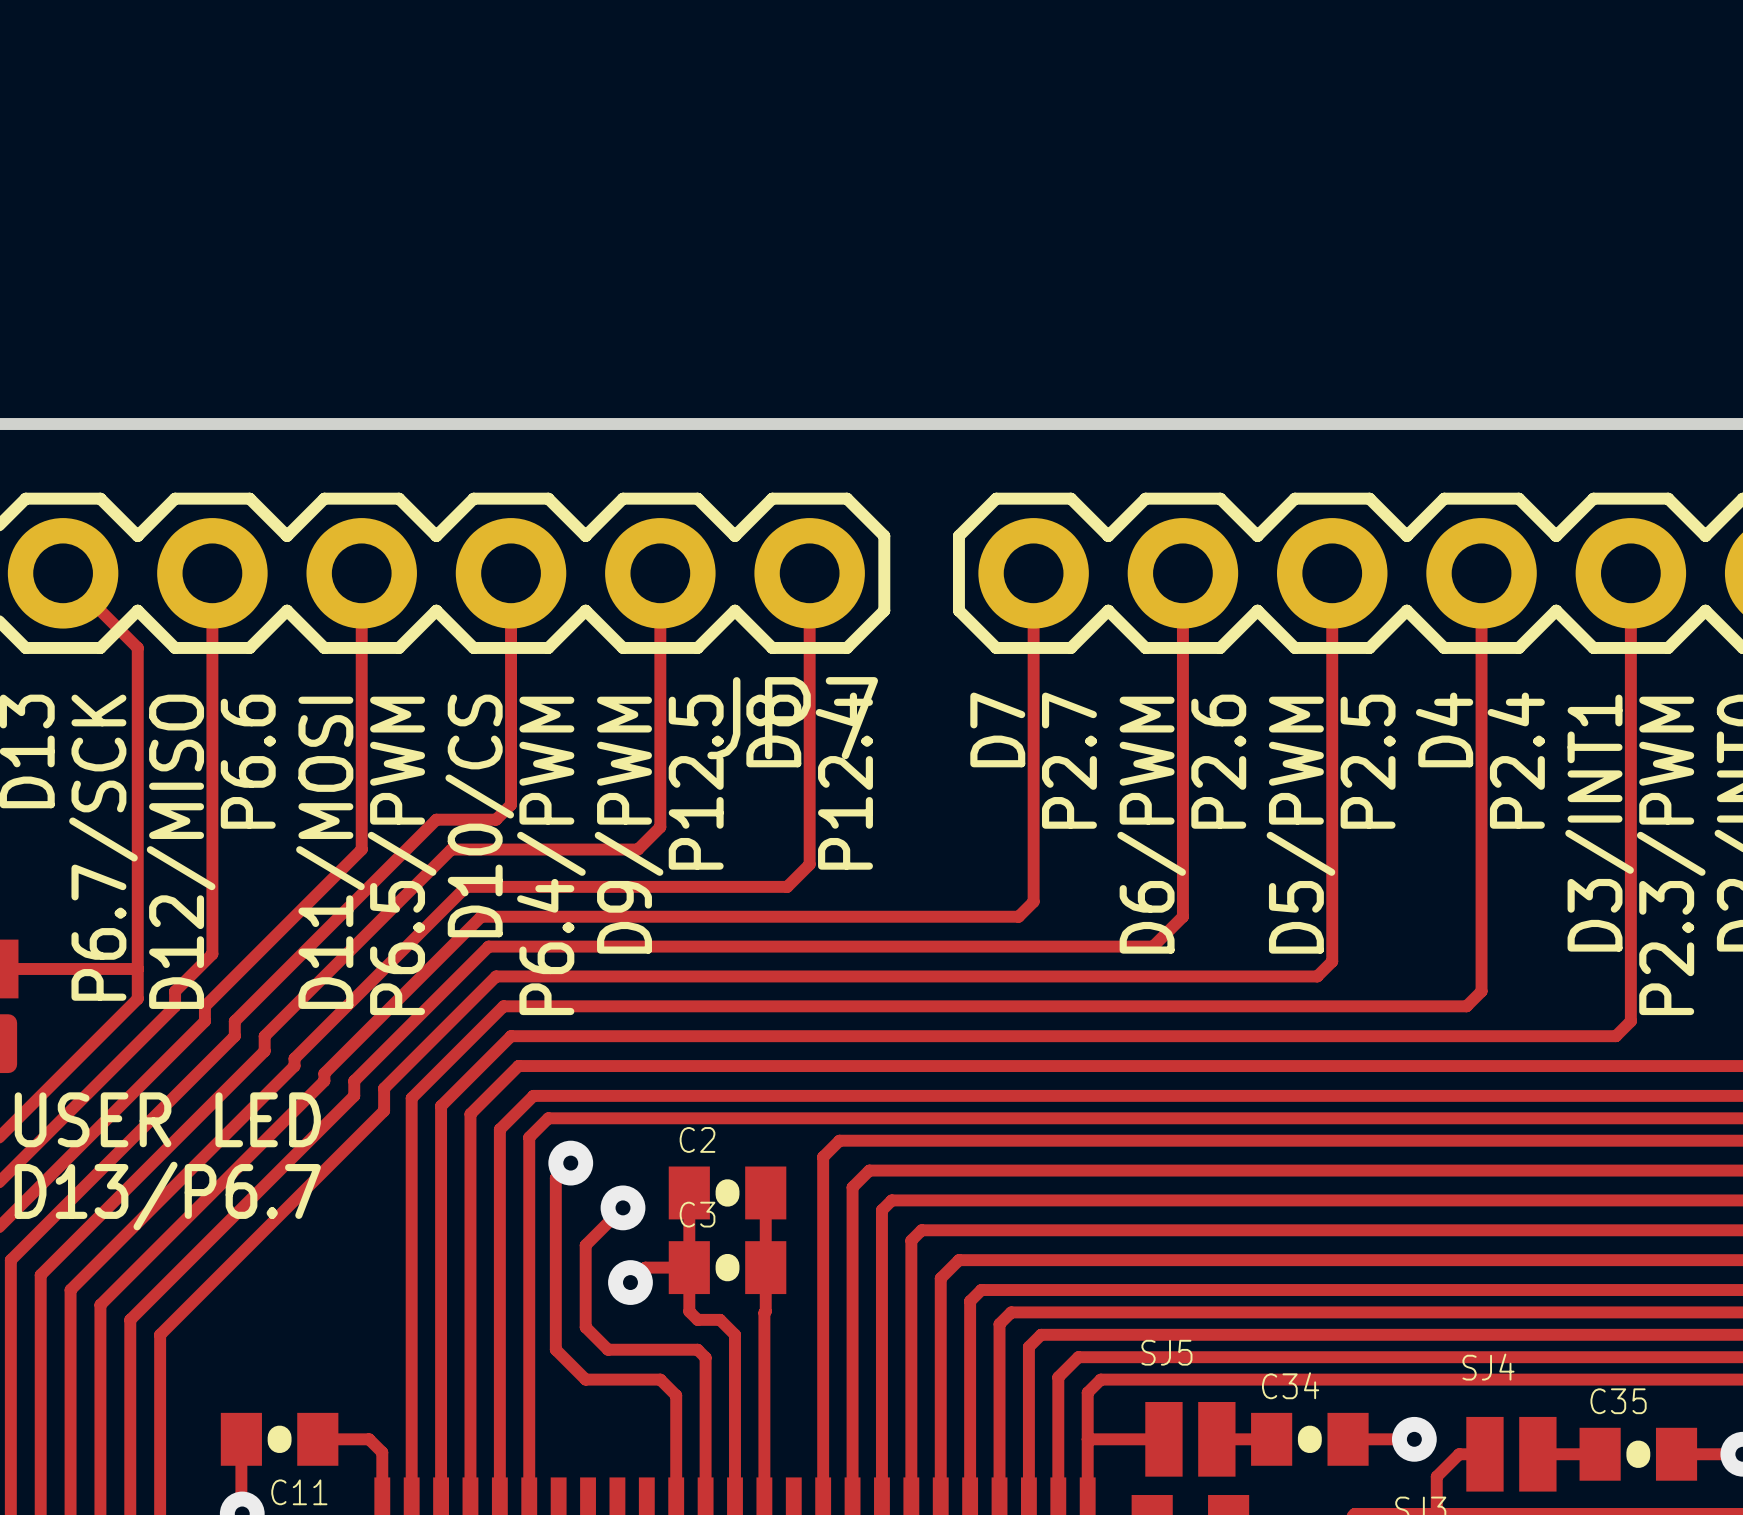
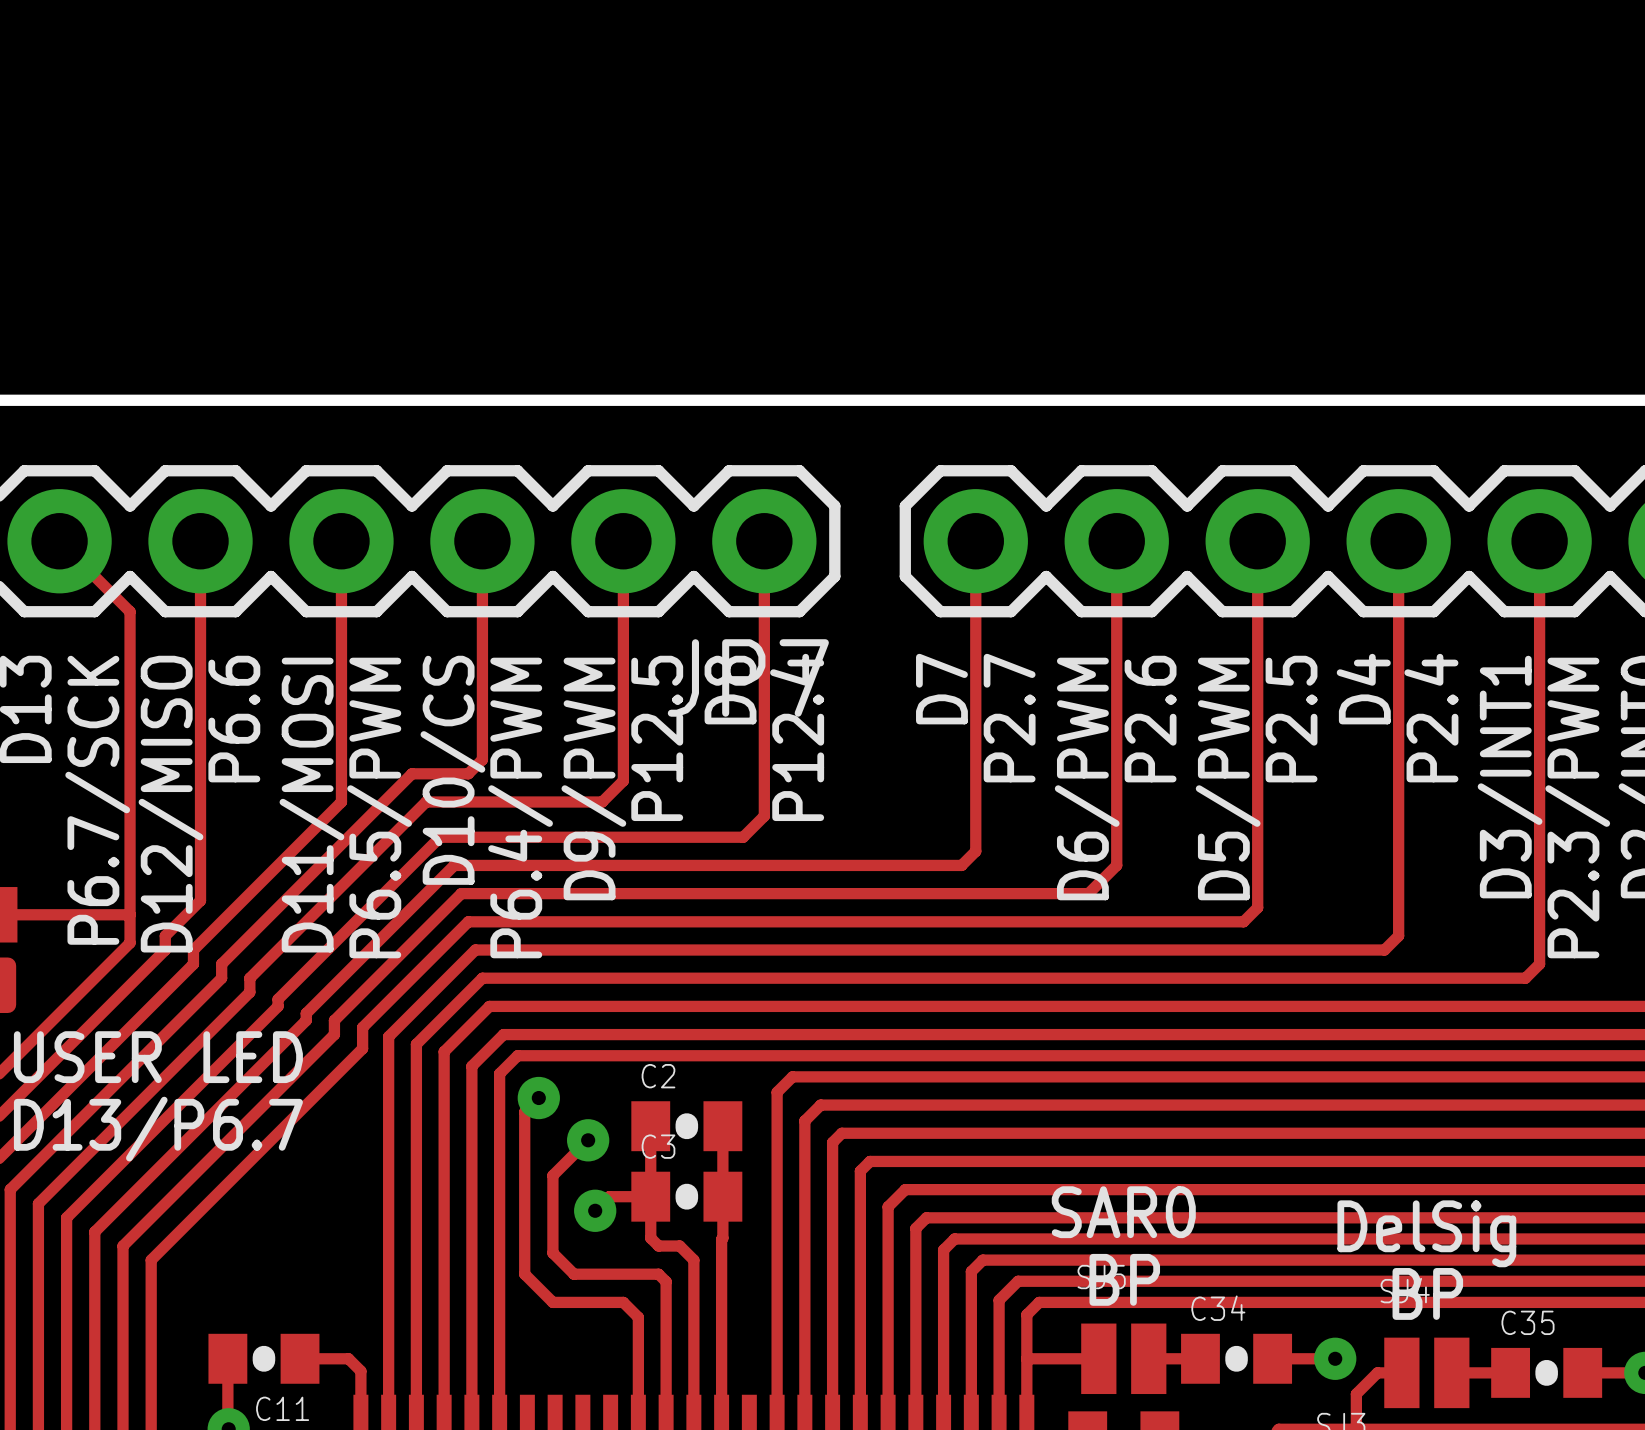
text: none -> SAR0 (1123, 1212)
text: none -> DelSig (1426, 1233)
text: none -> BP (1124, 1279)
text: none -> BP (1427, 1293)

